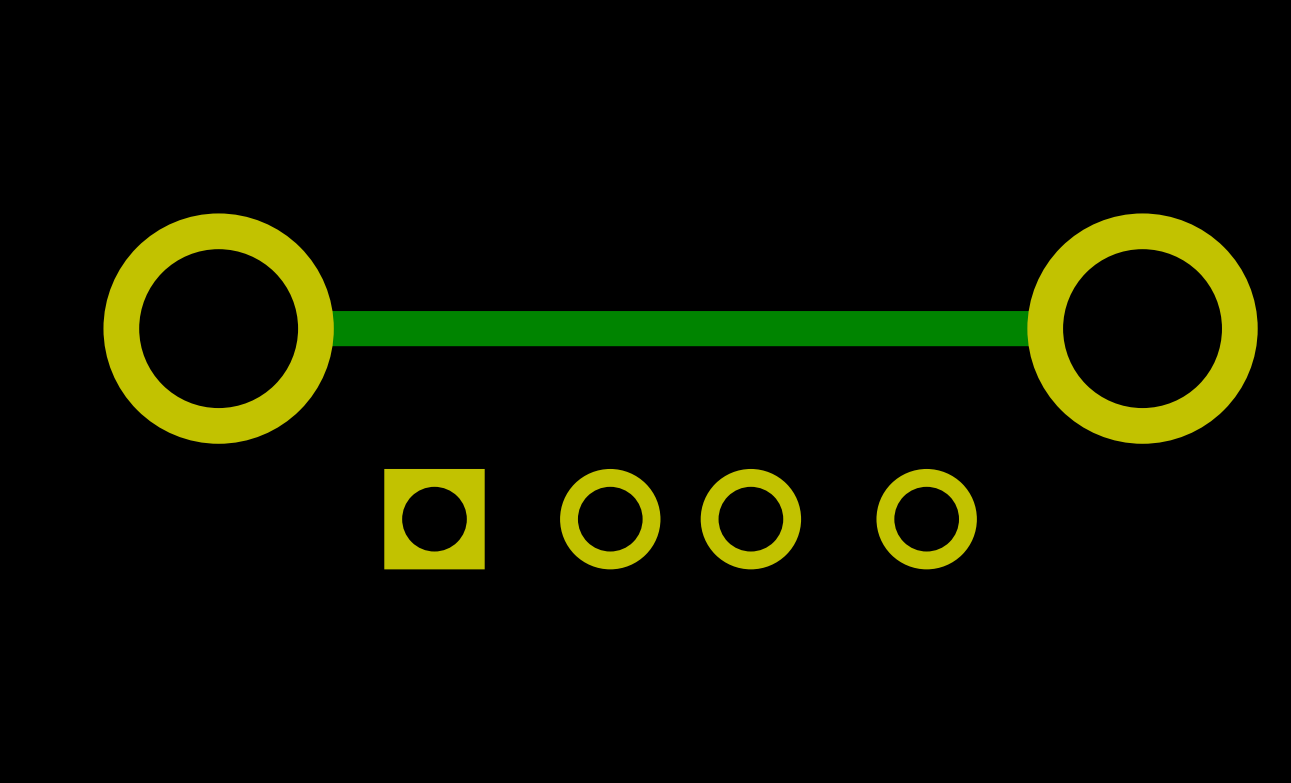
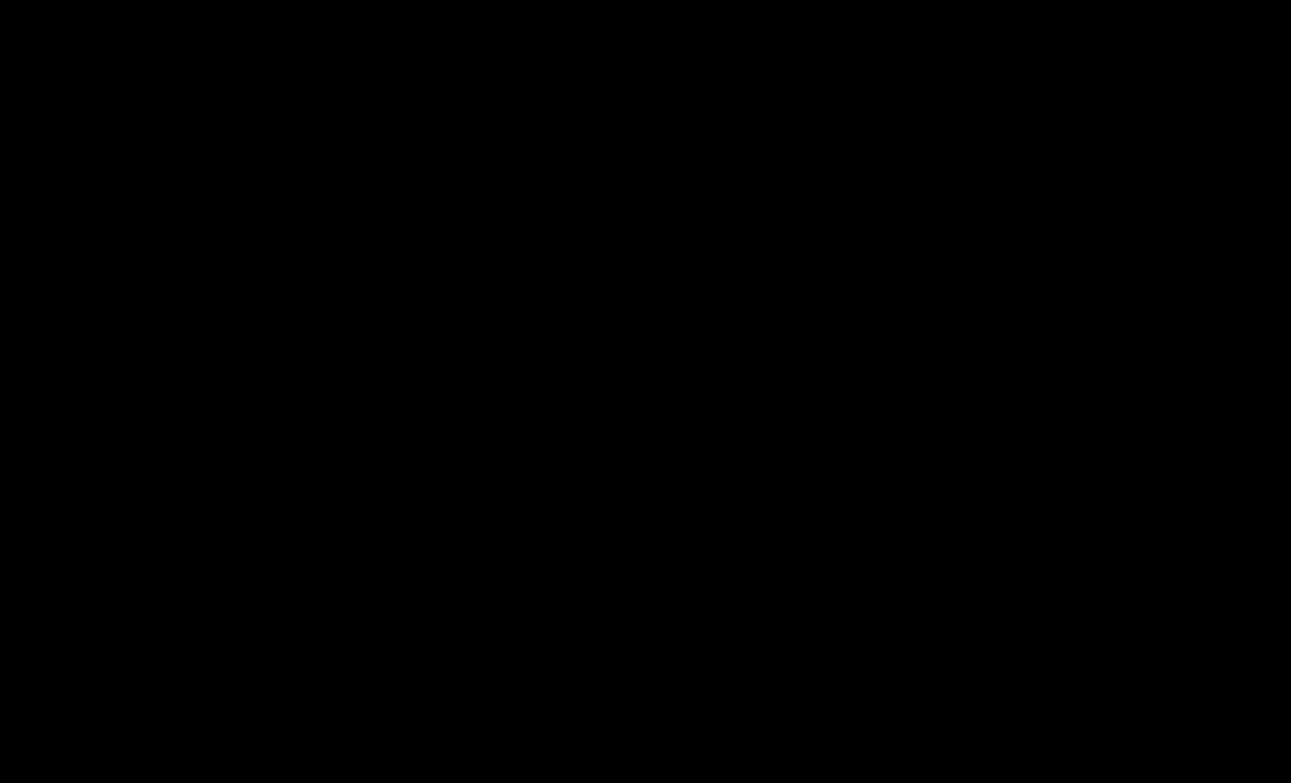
track: (1142, 328) (218, 328) -> none
part: (680, 391) -> none

